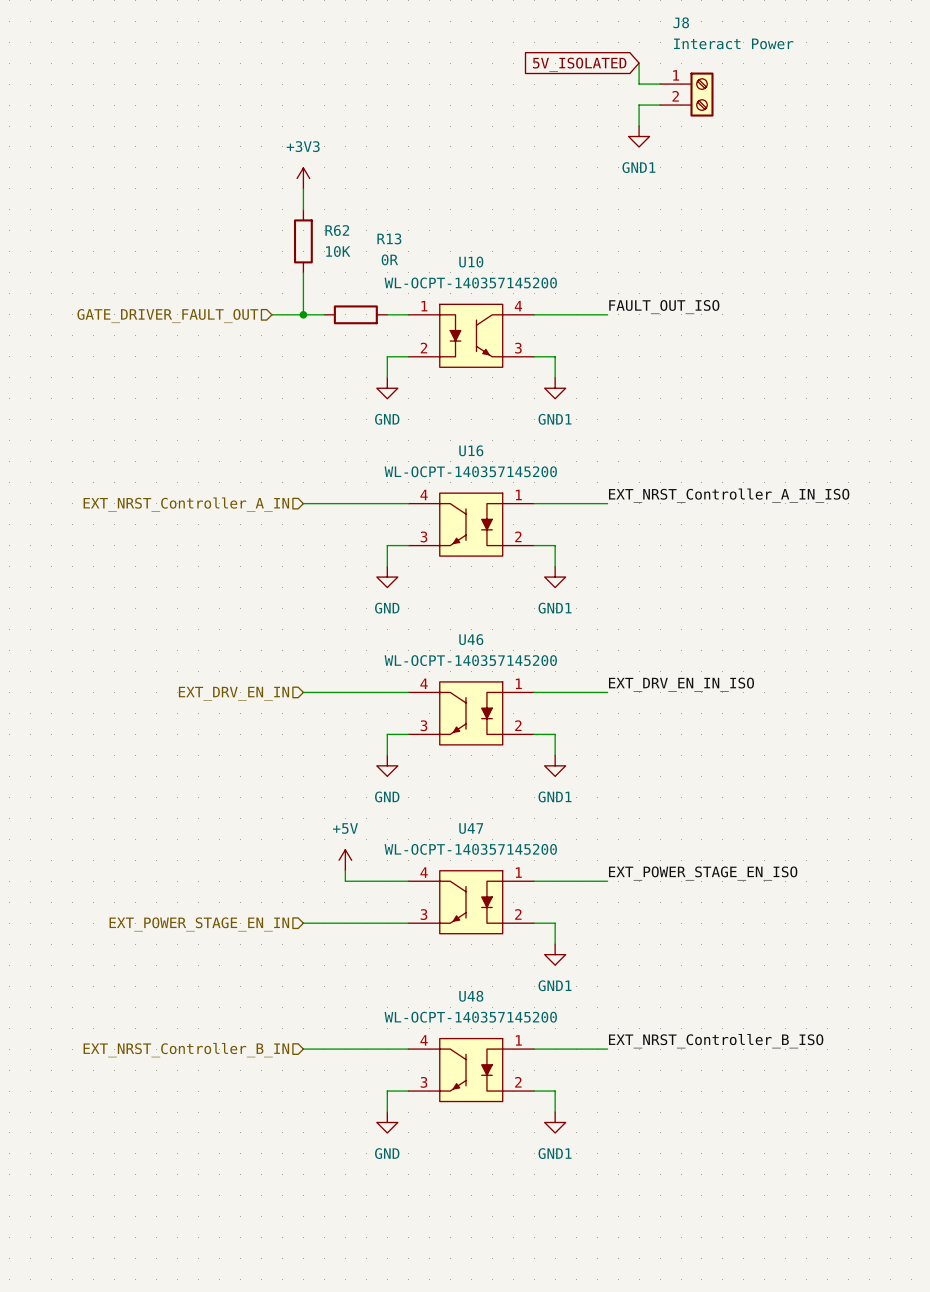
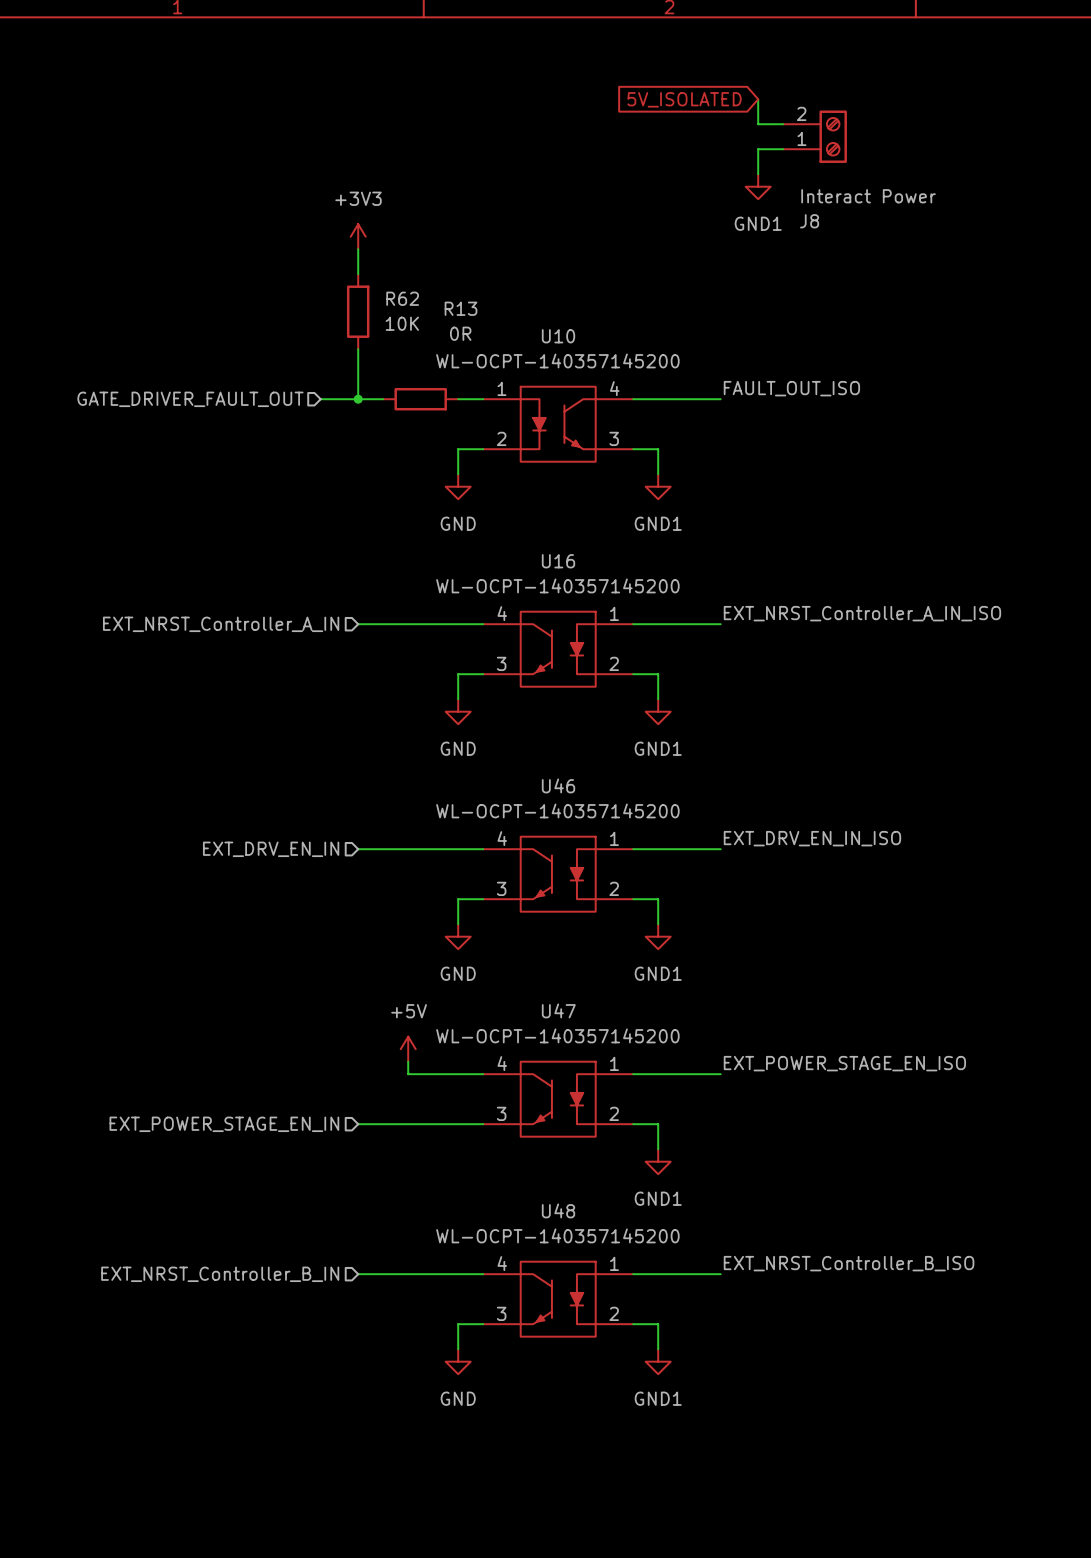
J8 flip: as is (701, 94) -> up-down (833, 136)

